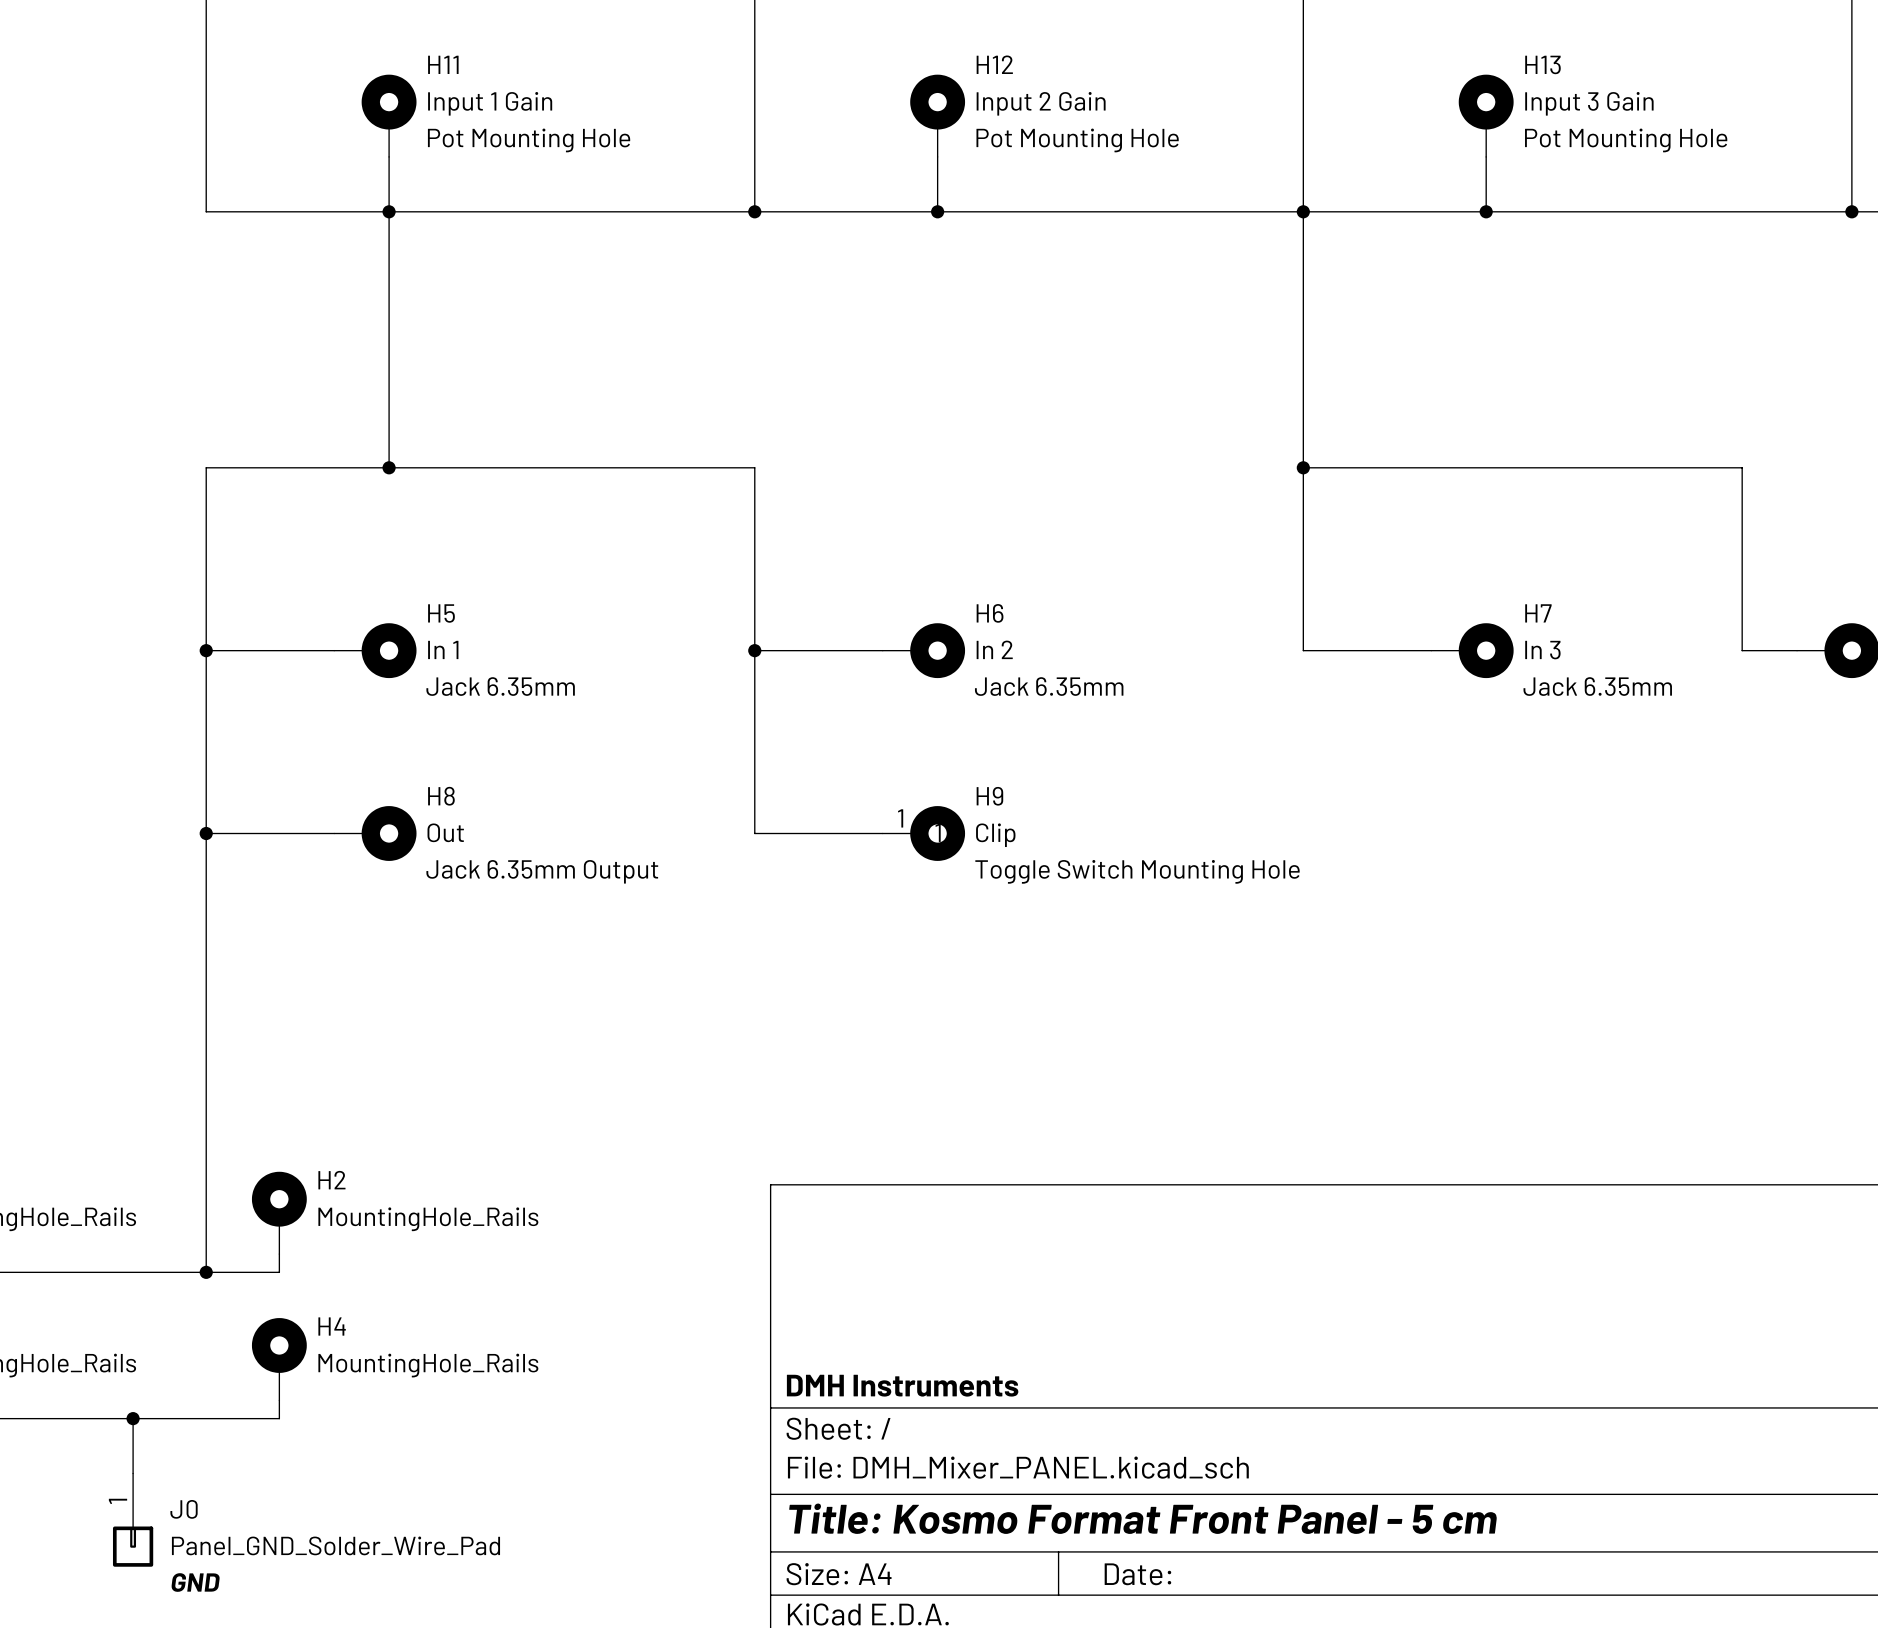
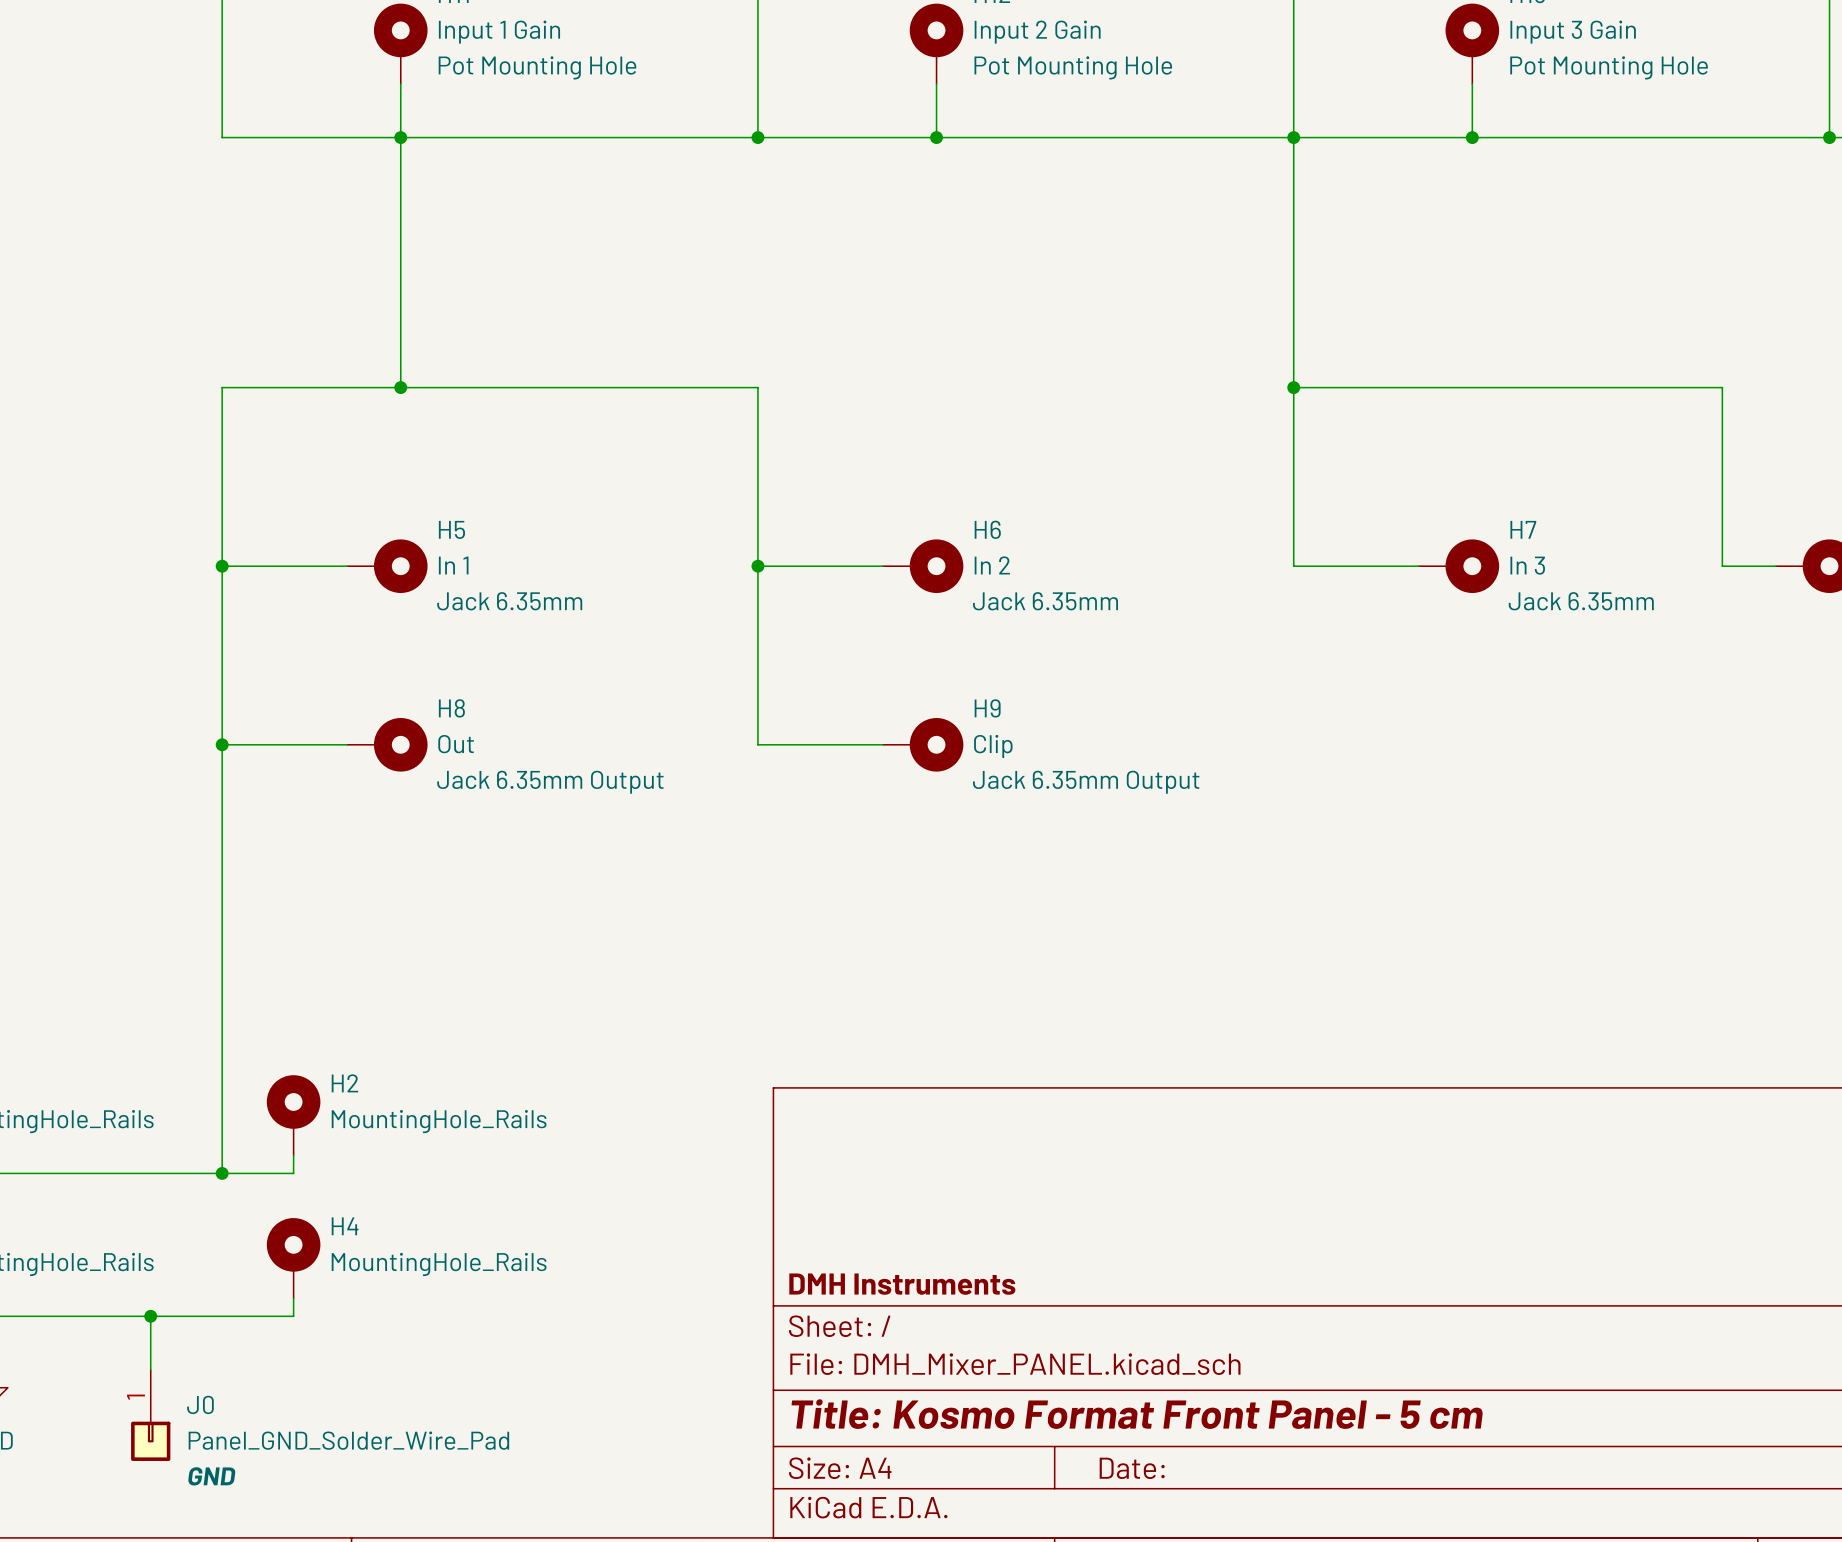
H9 pin number: 1 (900, 818) -> none
H9 pin name: 1 (938, 832) -> none
H9 text: Toggle Switch Mounting Hole (1137, 871) -> Jack 6.35mm Output (1086, 782)

